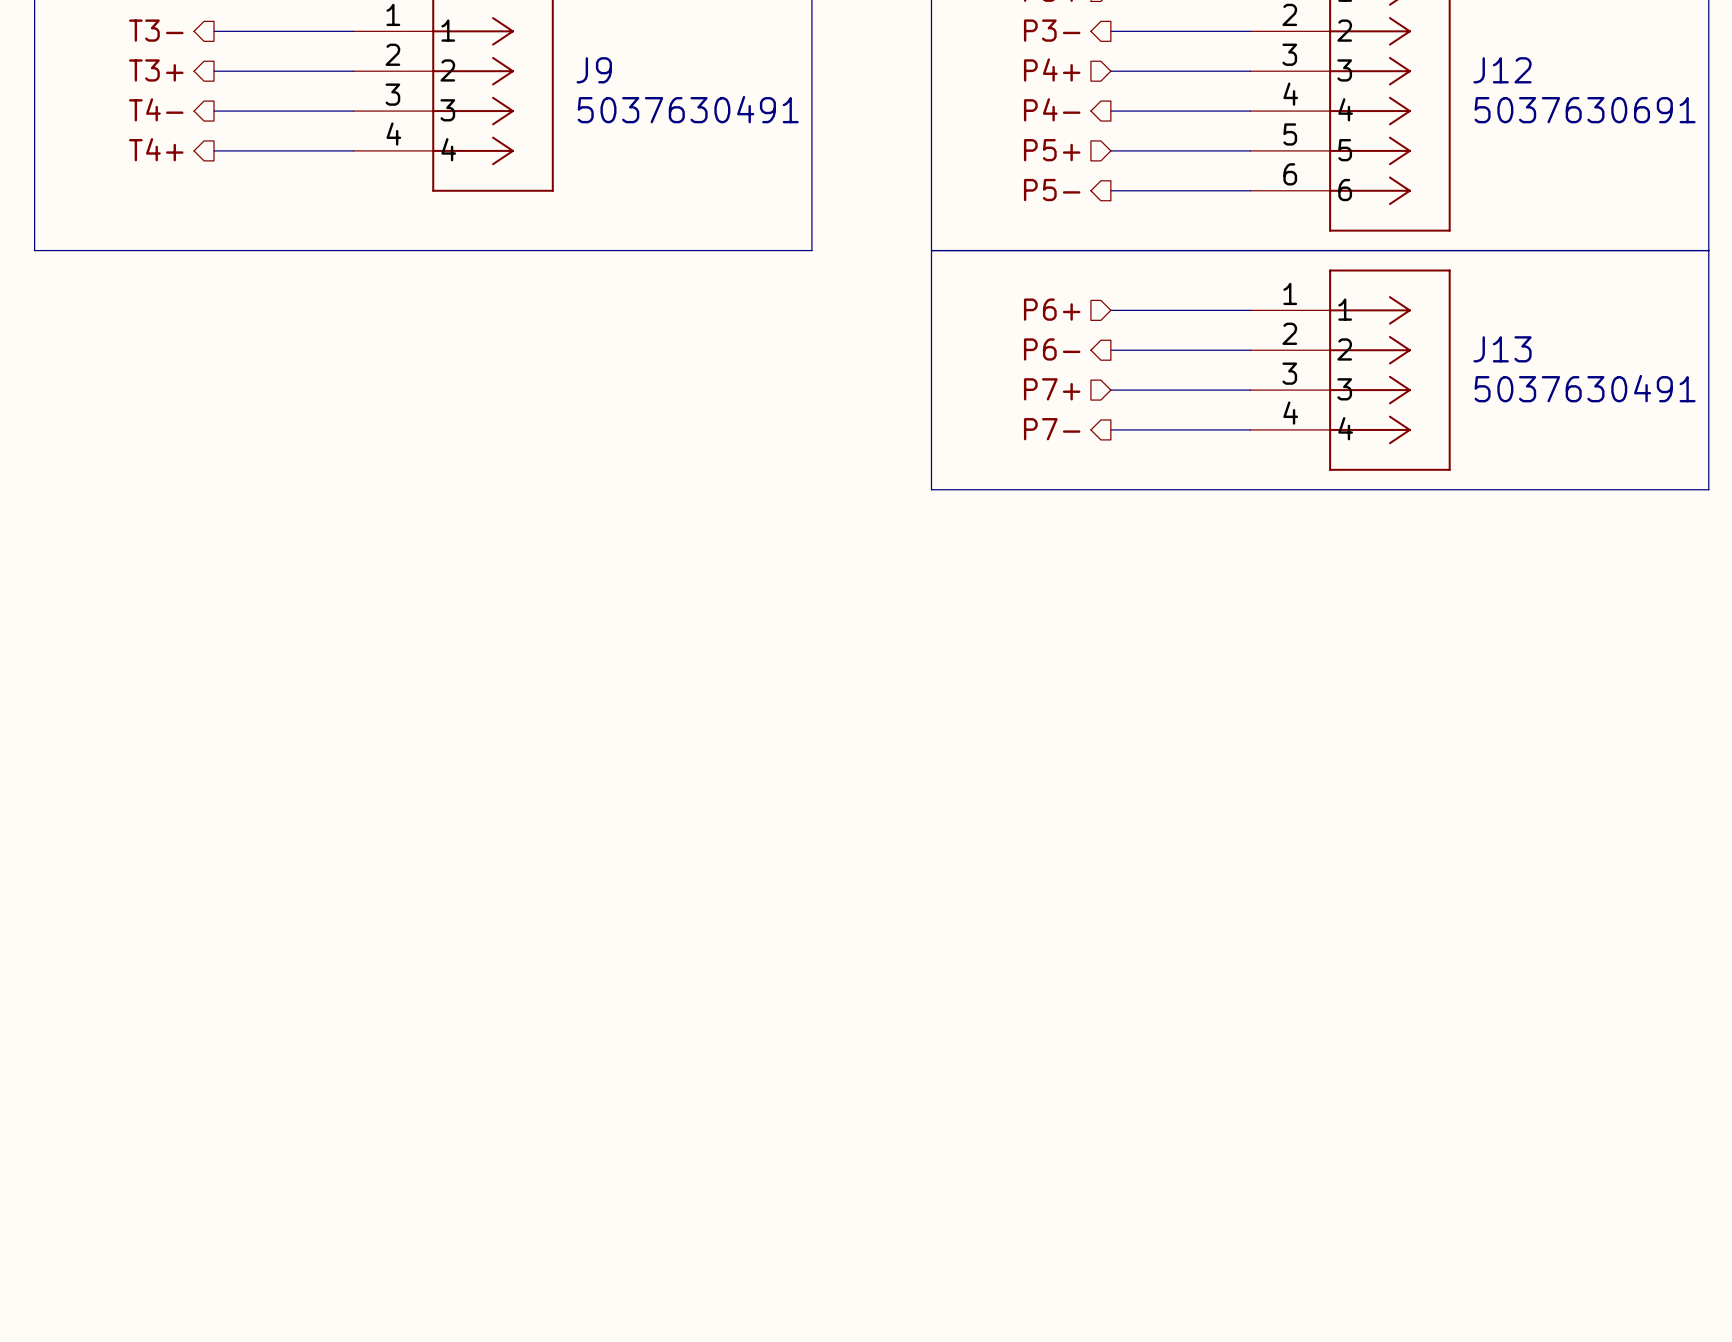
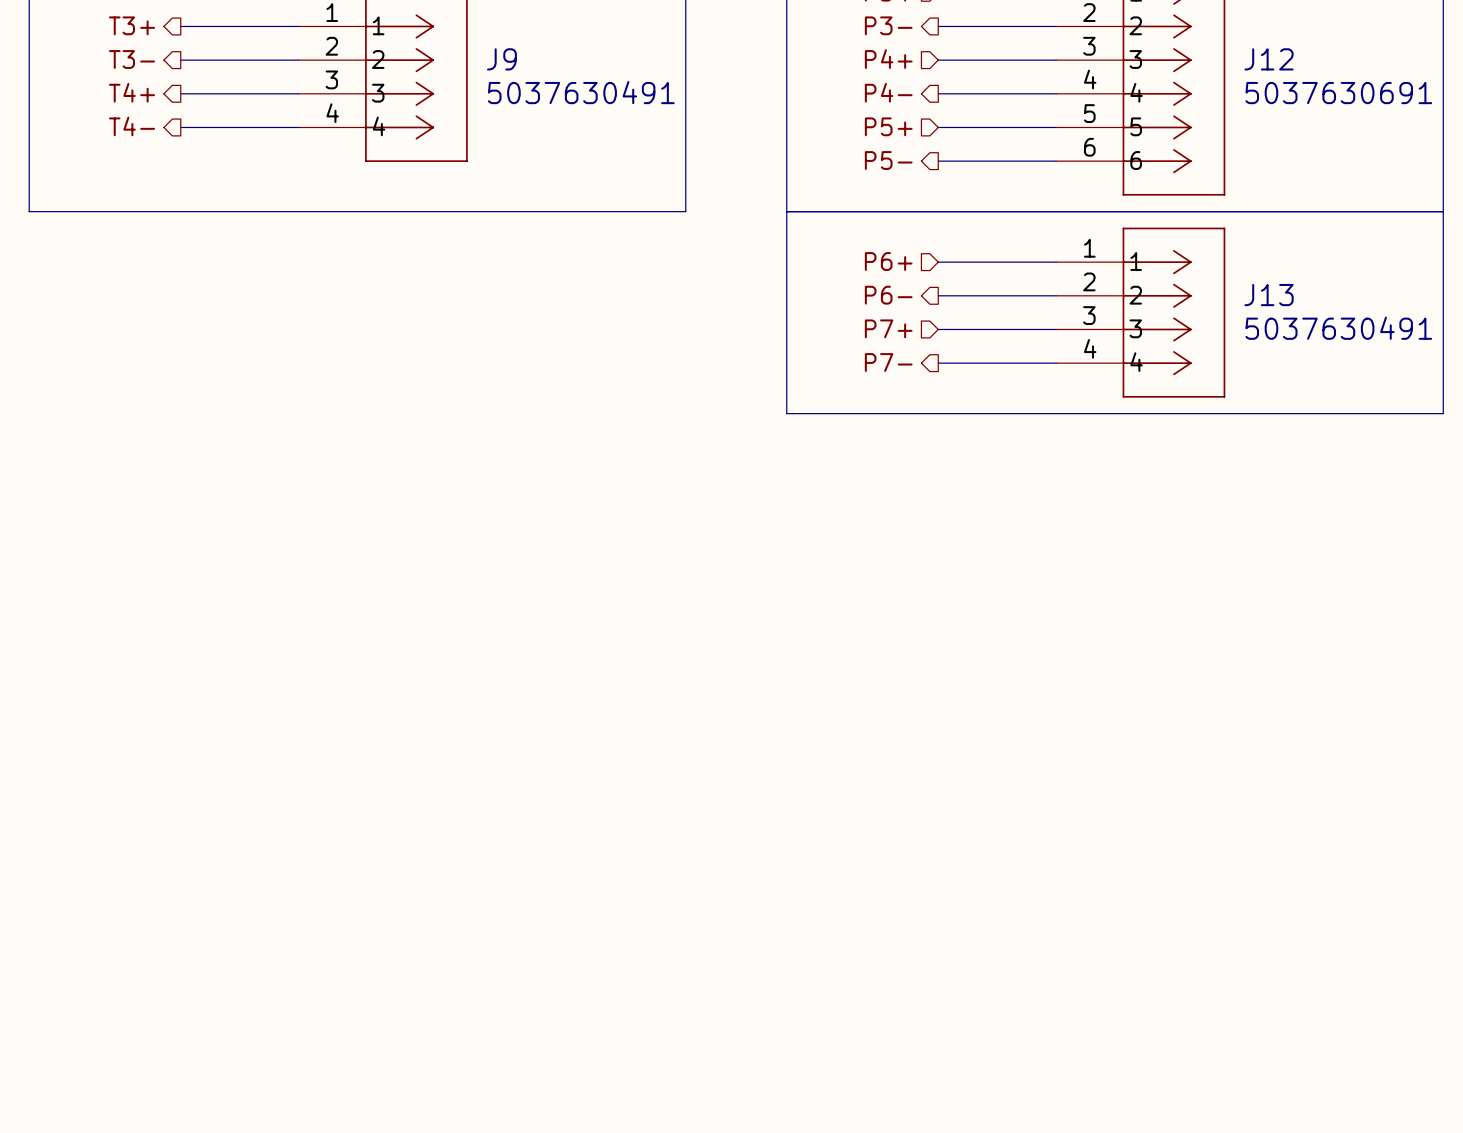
hierarchical label: T3- (156, 30) -> T3+ (131, 25)
hierarchical label: T3+ (156, 70) -> T3- (131, 59)
hierarchical label: T4- (156, 109) -> T4+ (131, 92)
hierarchical label: T4+ (156, 149) -> T4- (131, 126)

